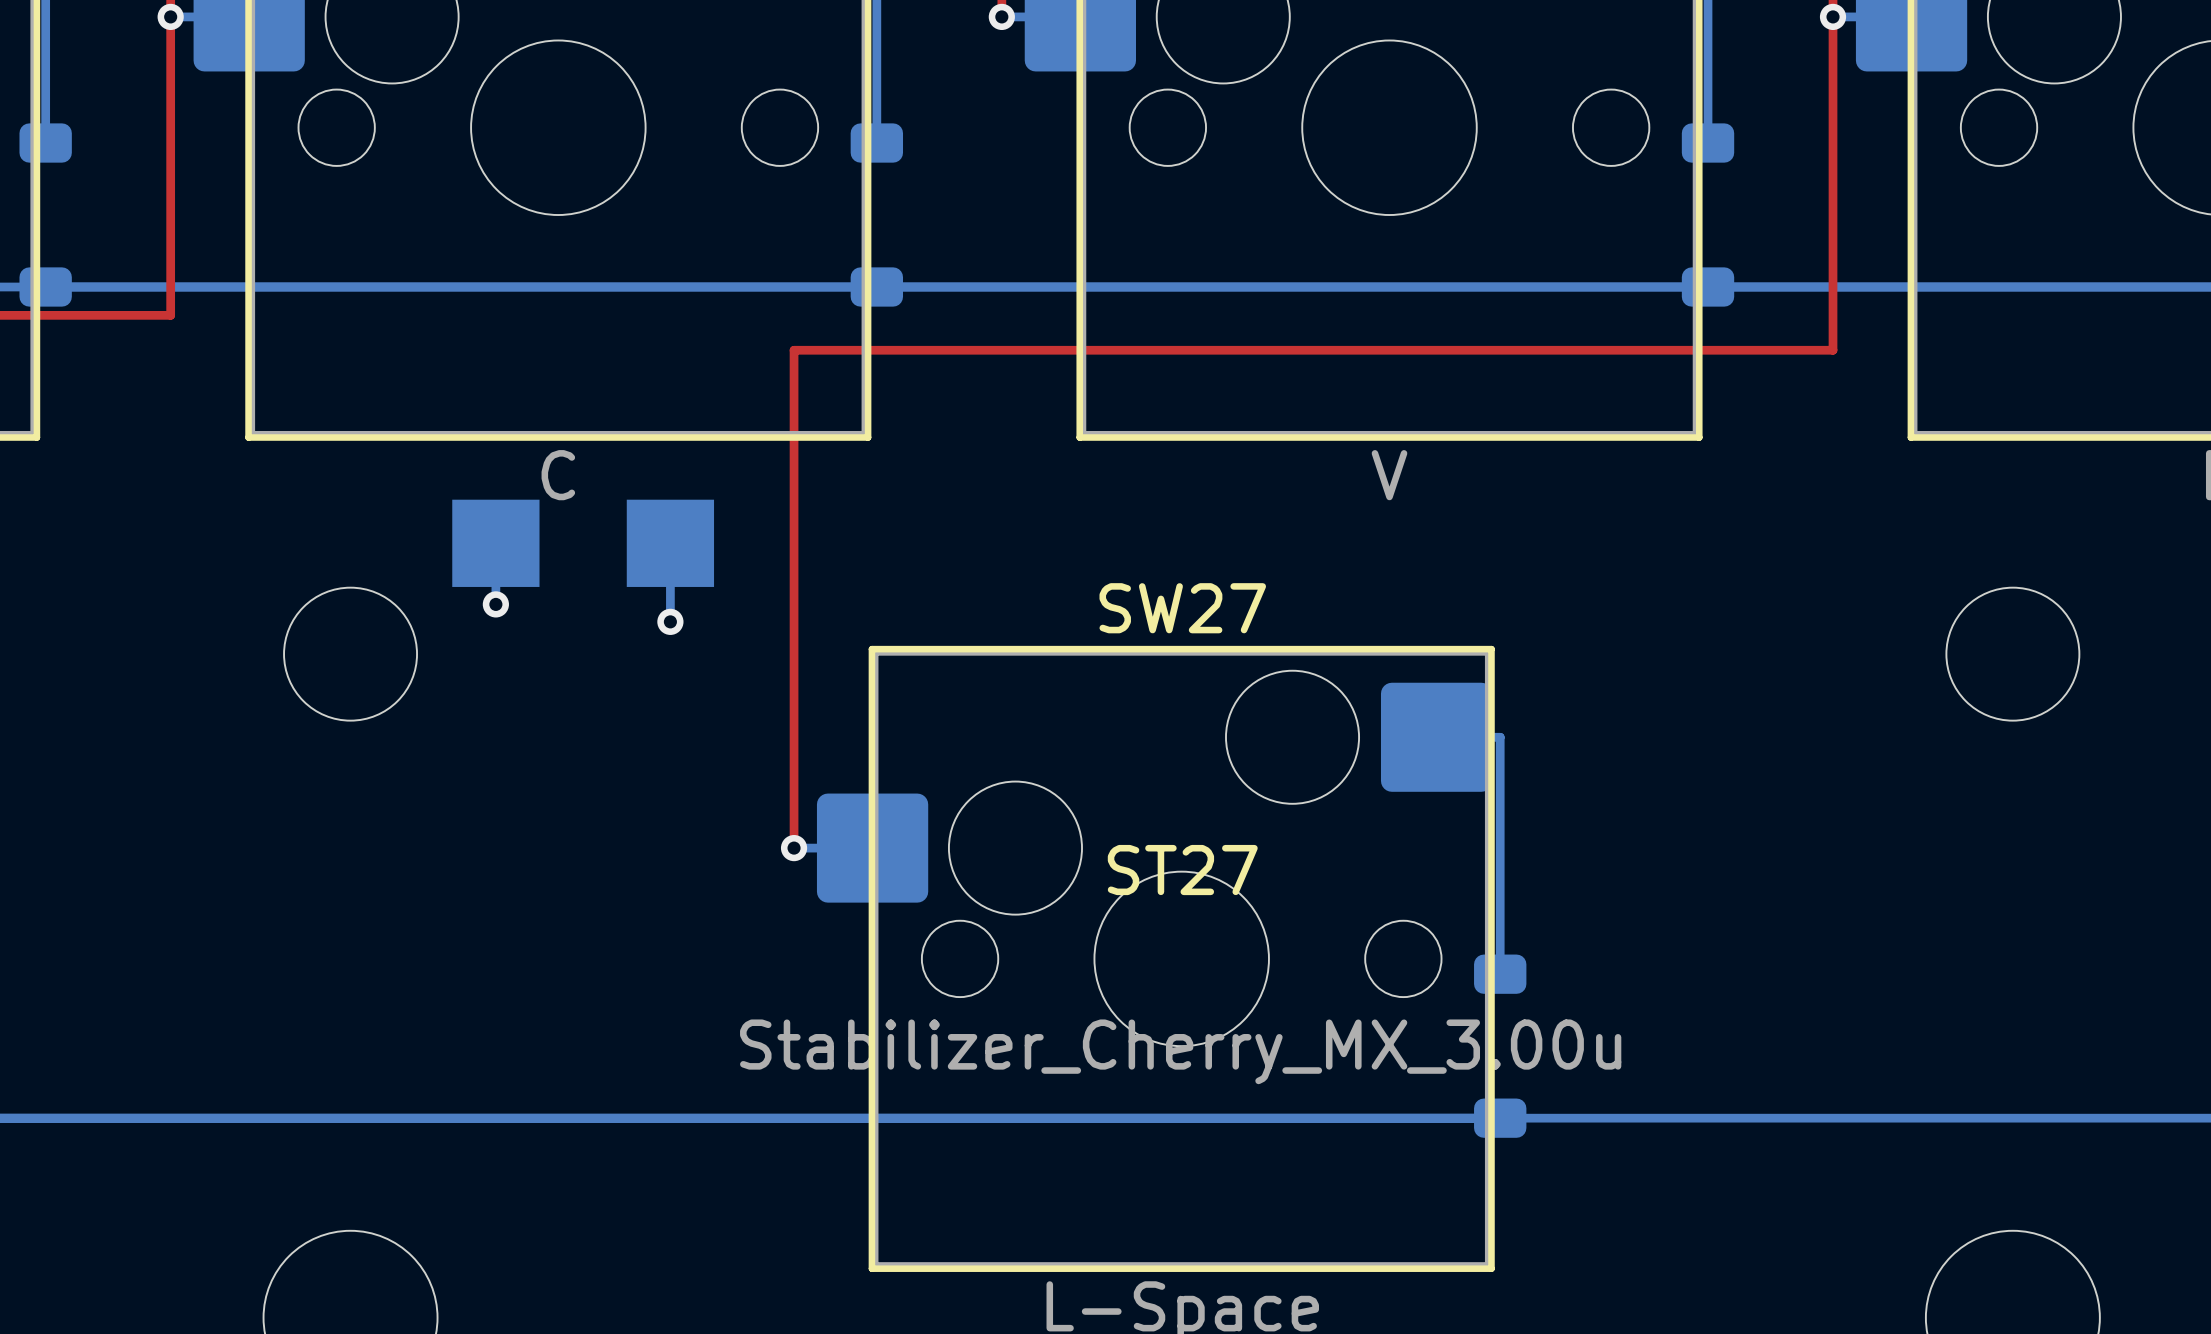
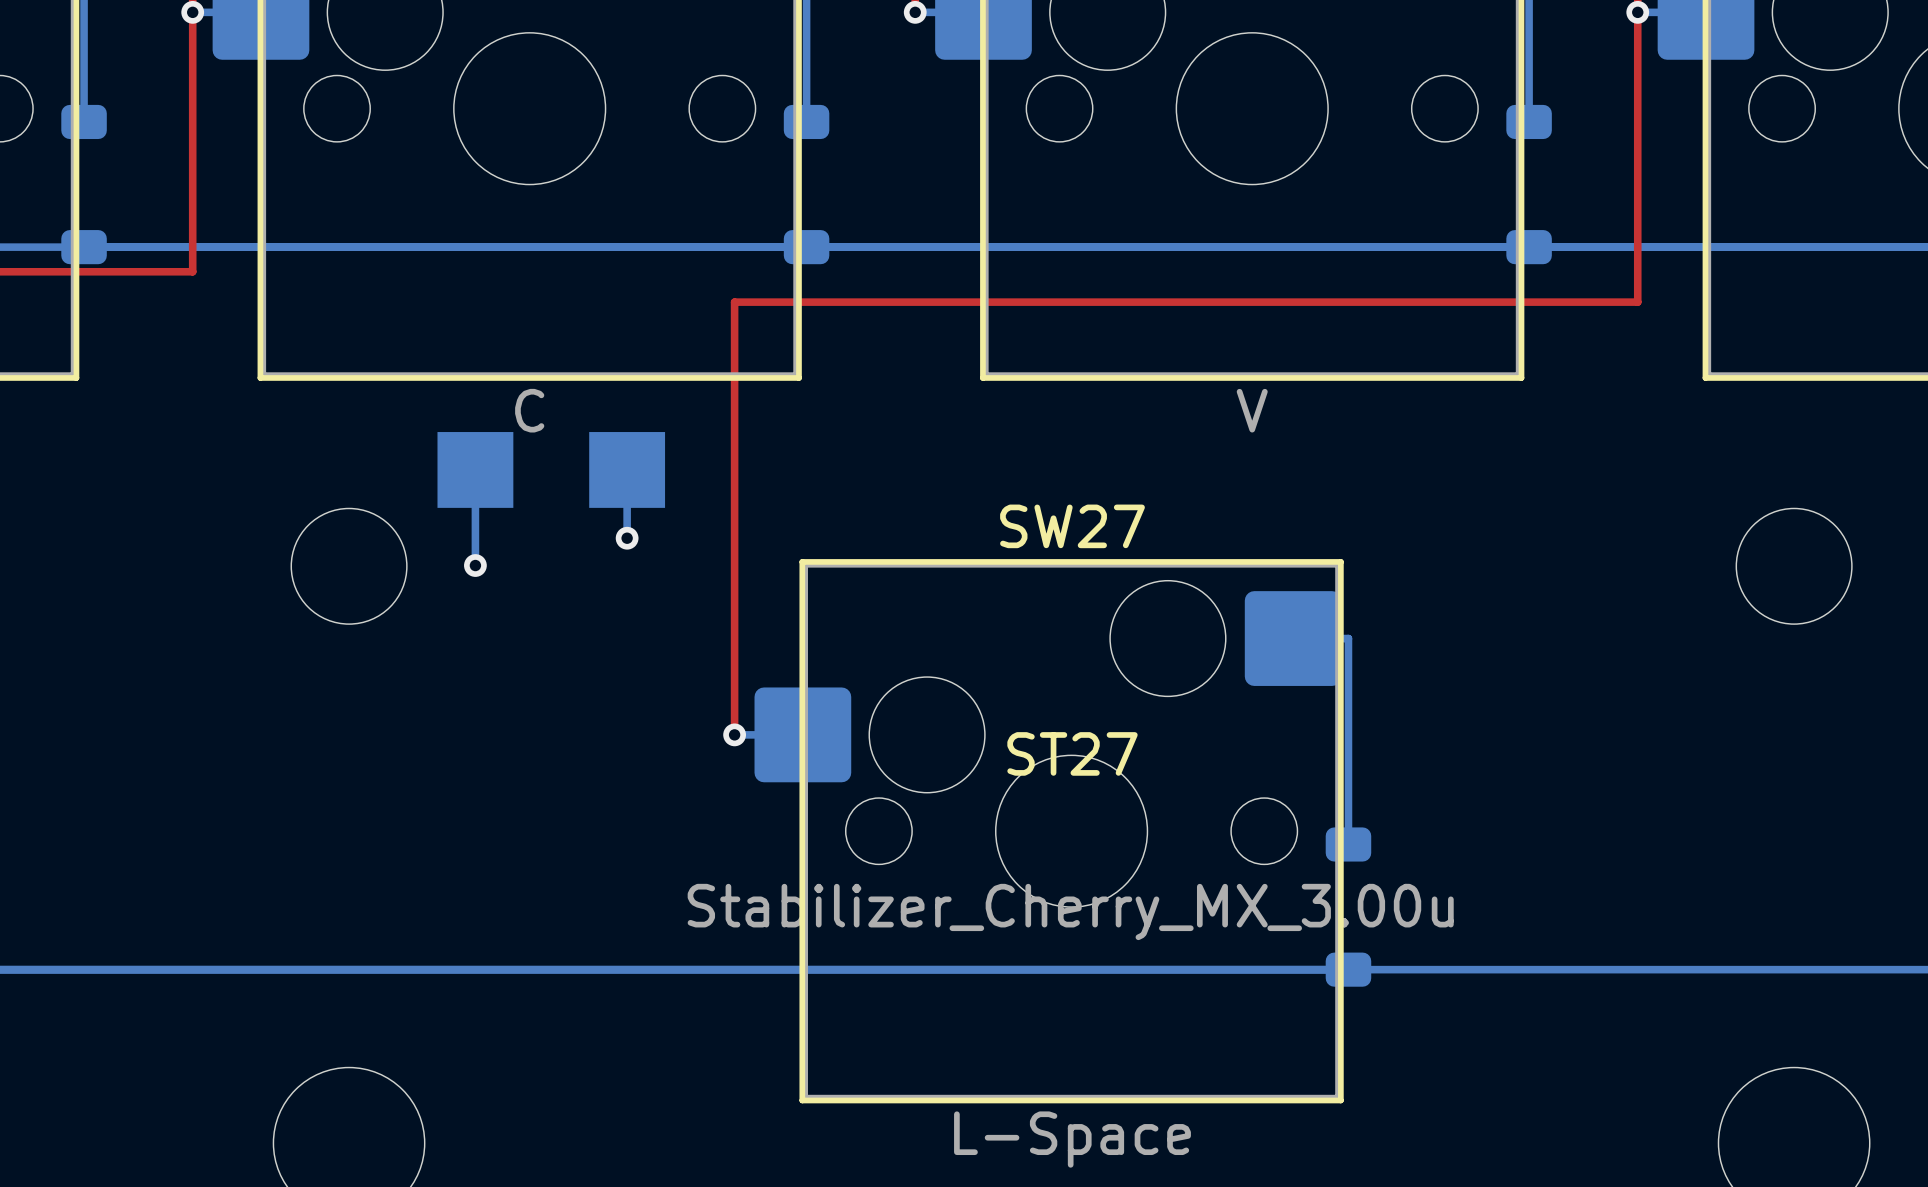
bottom track: none -> (475, 523) (475, 565)
via position: (495, 604) -> (475, 565)

